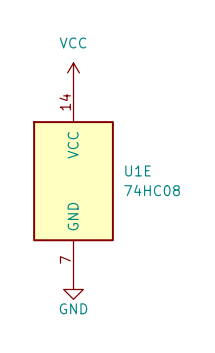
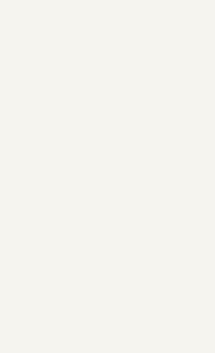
power symbol: VCC (73, 72) -> none
U1E: 74HC08 (73, 181) -> none
power symbol: GND (73, 289) -> none

